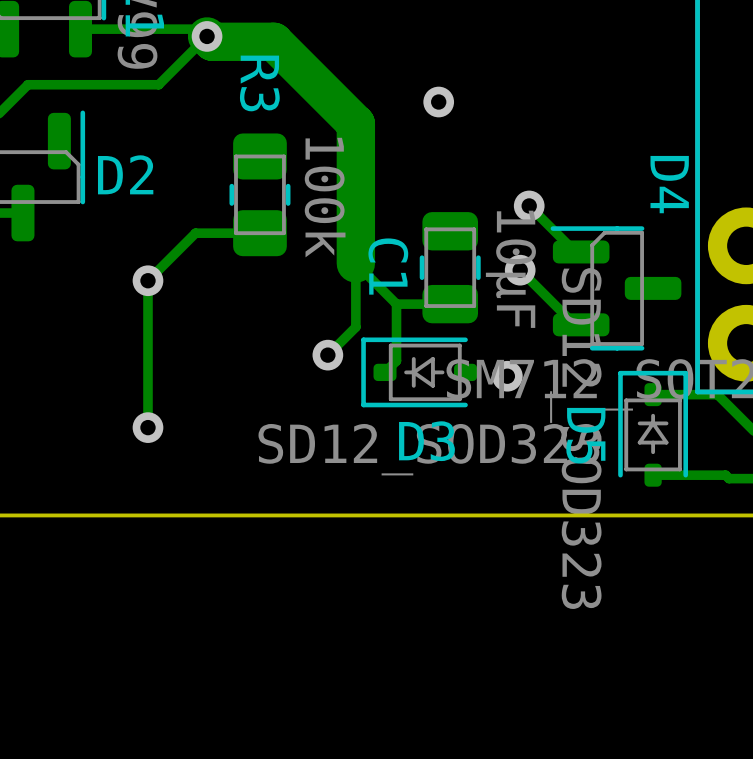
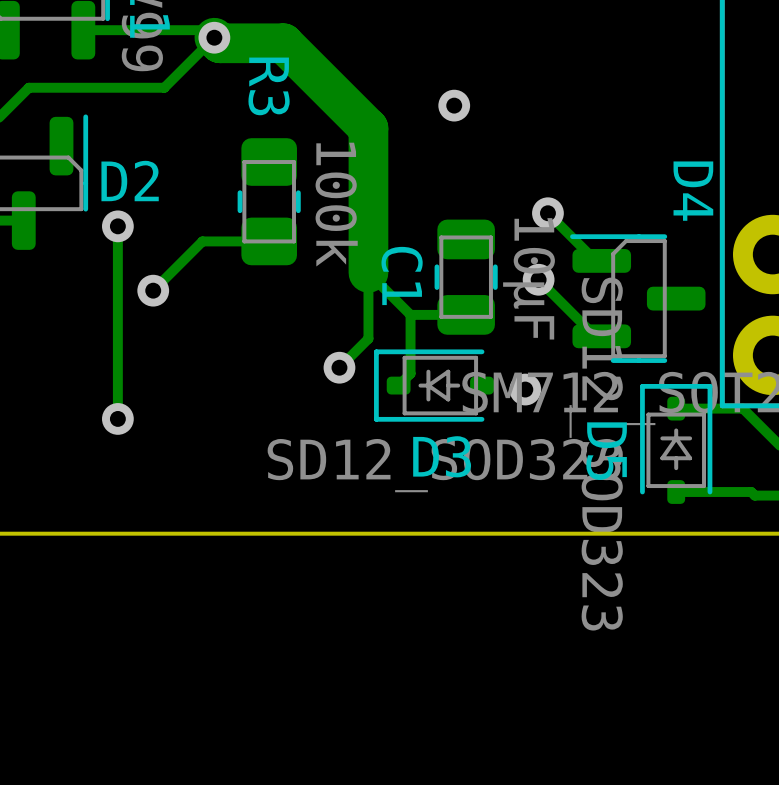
track: none -> (117, 226) (117, 418)
via: none -> (117, 226)
track: (147, 280) (147, 427) -> none
via position: (147, 427) -> (117, 418)

